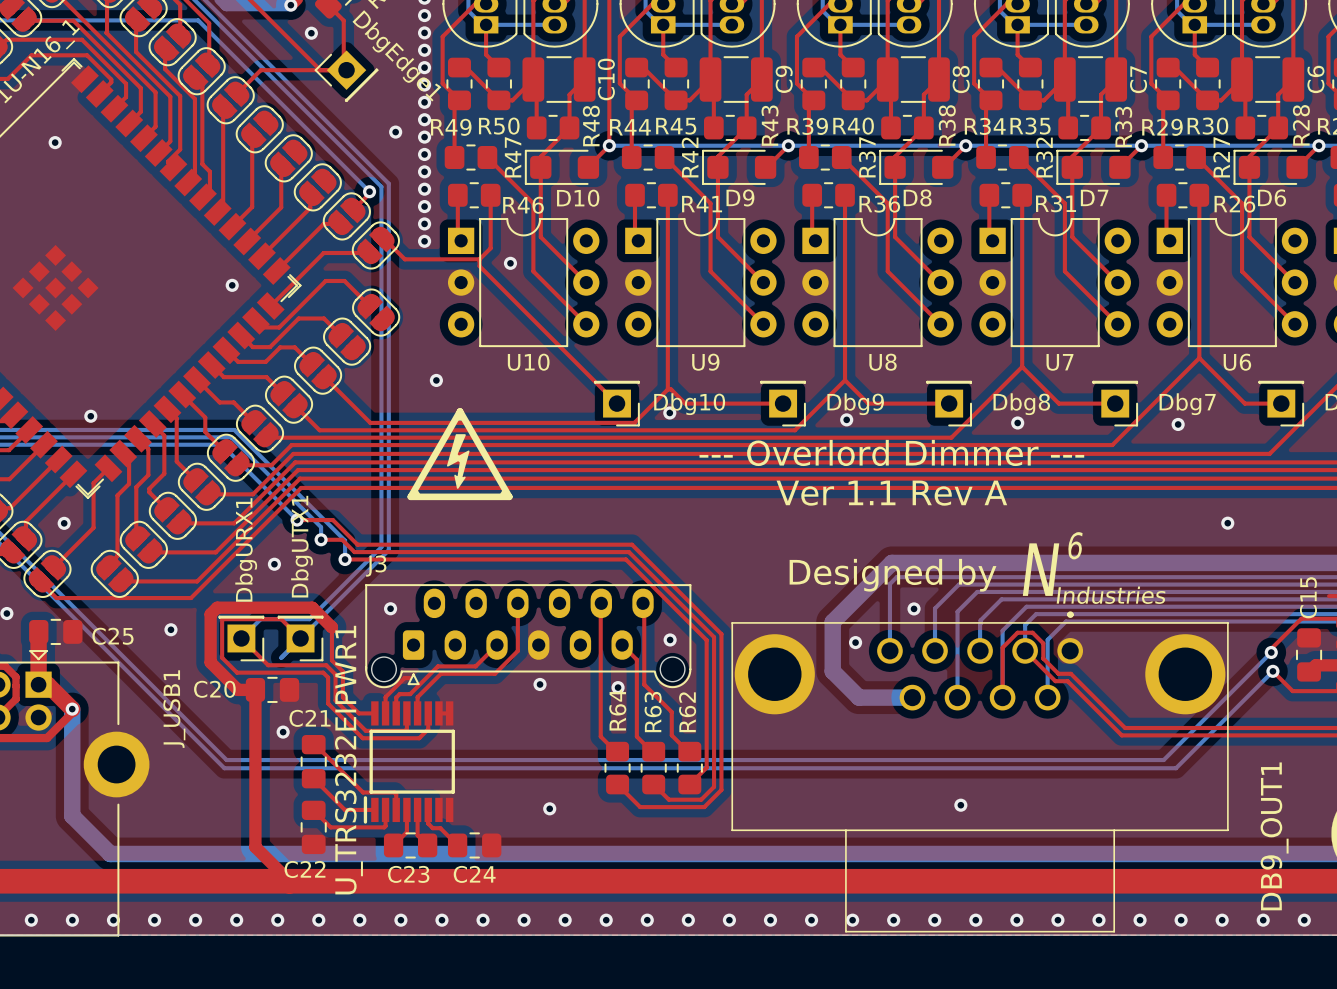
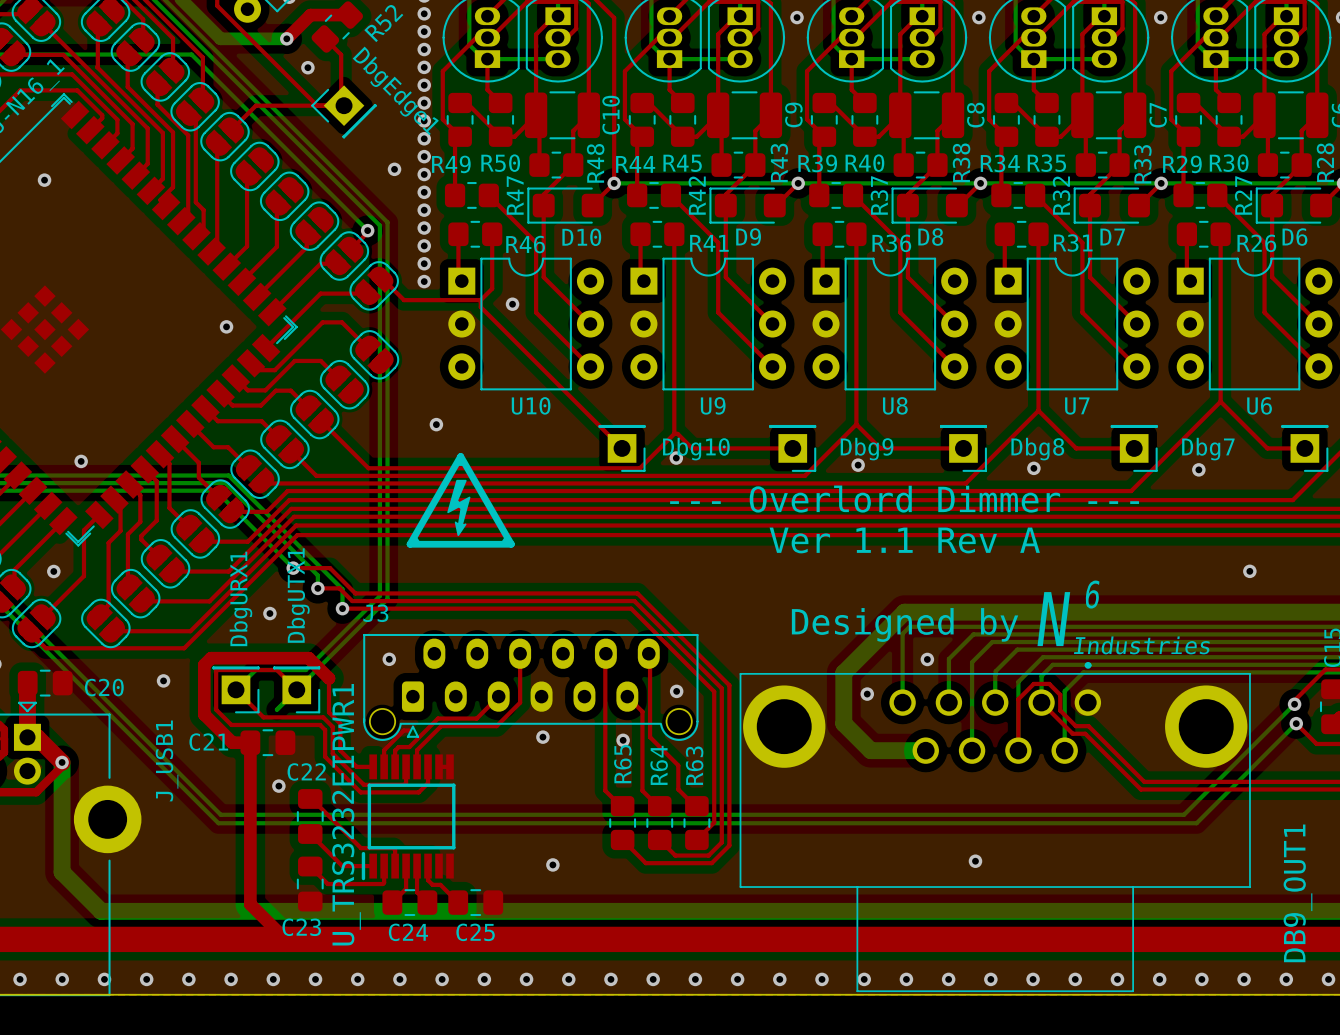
C25 name: C25 (112, 636) -> C20 (104, 687)
C20 name: C20 (214, 689) -> C21 (208, 742)
R64 name: R64 (617, 710) -> R65 (622, 764)
R63 name: R63 (653, 712) -> R64 (659, 765)
R62 name: R62 (687, 712) -> R63 (694, 765)
C21 name: C21 (310, 718) -> C22 (306, 771)
C22 name: C22 (304, 869) -> C23 (301, 927)
C23 name: C23 (408, 874) -> C24 (408, 932)
C24 name: C24 (474, 874) -> C25 (475, 932)

